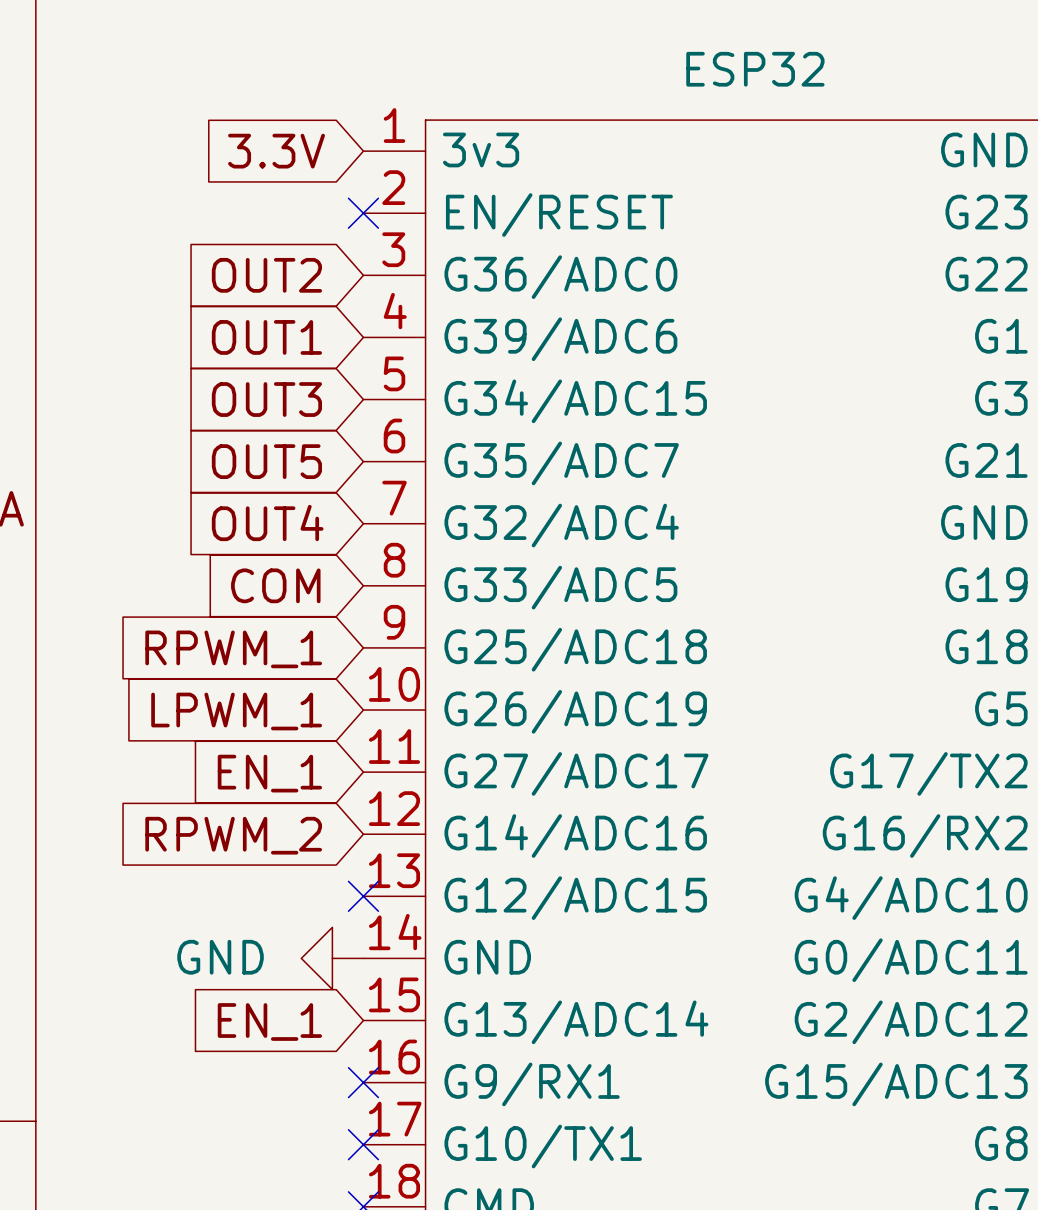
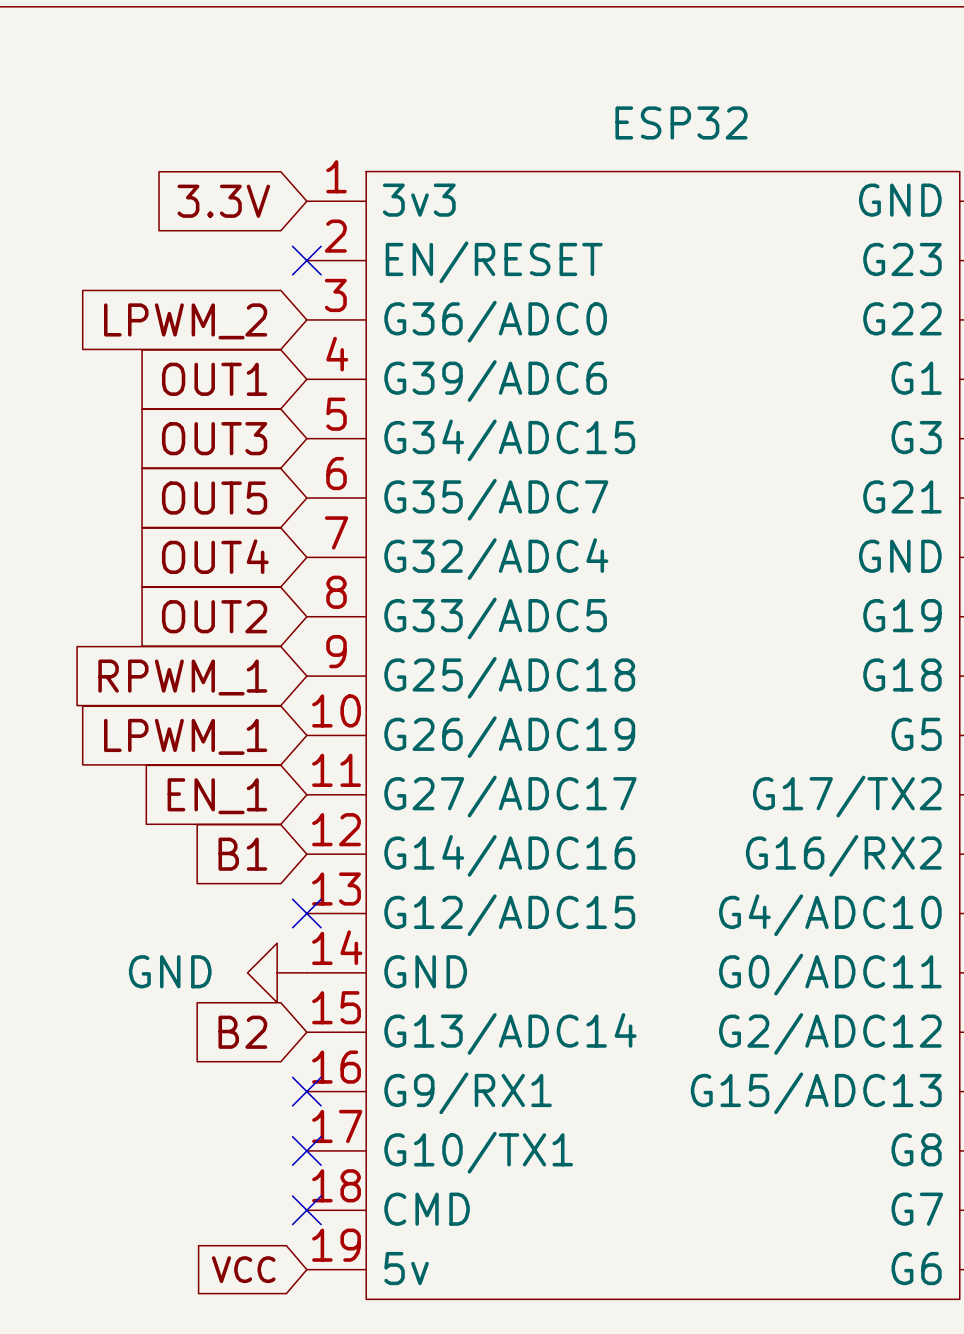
global label: OUT2 (266, 275) -> LPWM_2 (185, 321)
global label: COM (275, 585) -> OUT2 (214, 616)
global label: RPWM_2 (233, 835) -> B1 (242, 854)
global label: EN_1 (269, 1021) -> B2 (242, 1032)

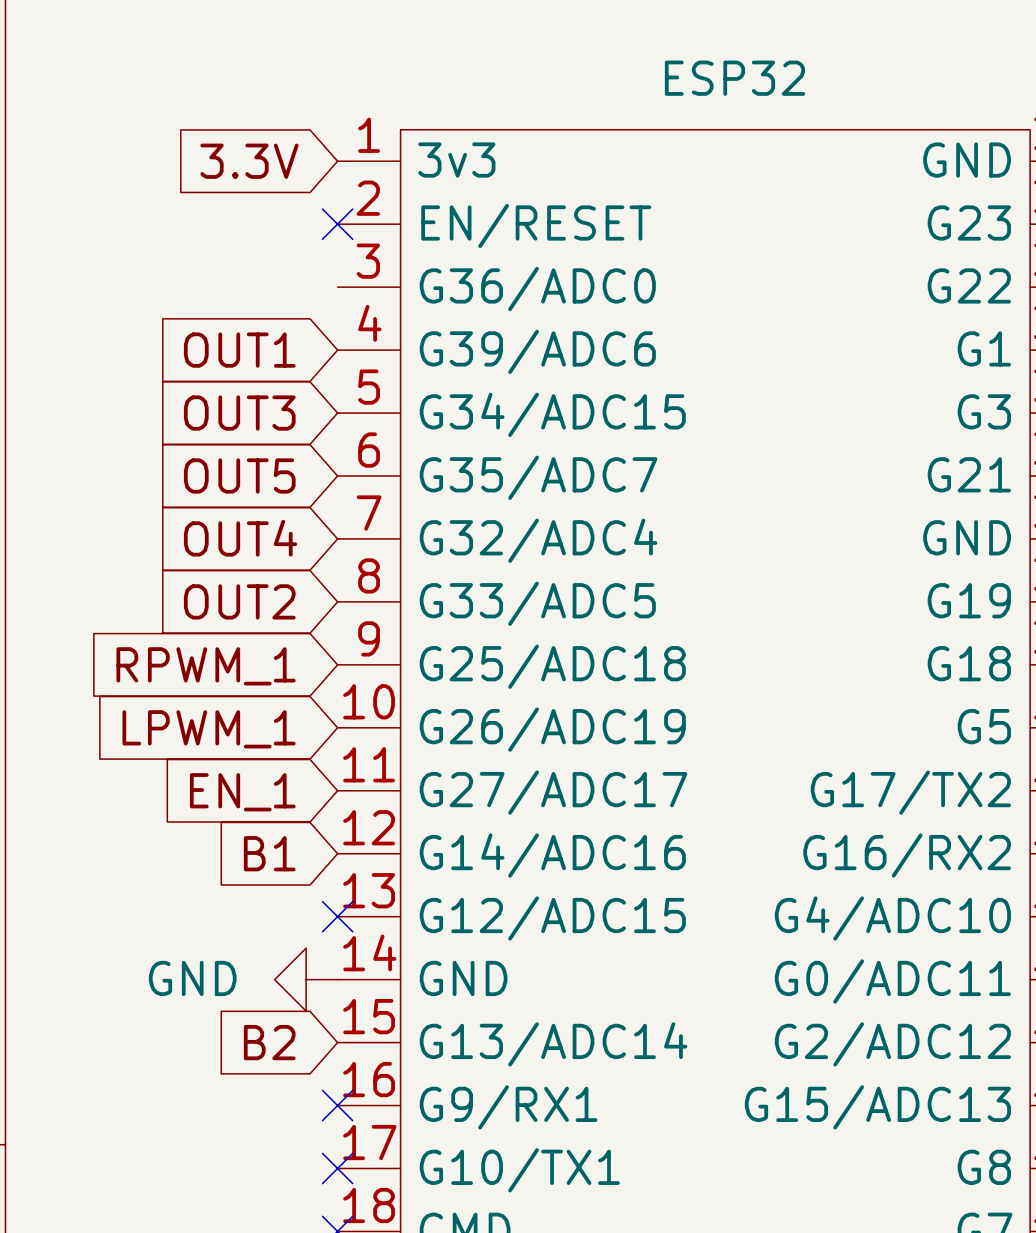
global label: LPWM_2 (185, 321) -> none

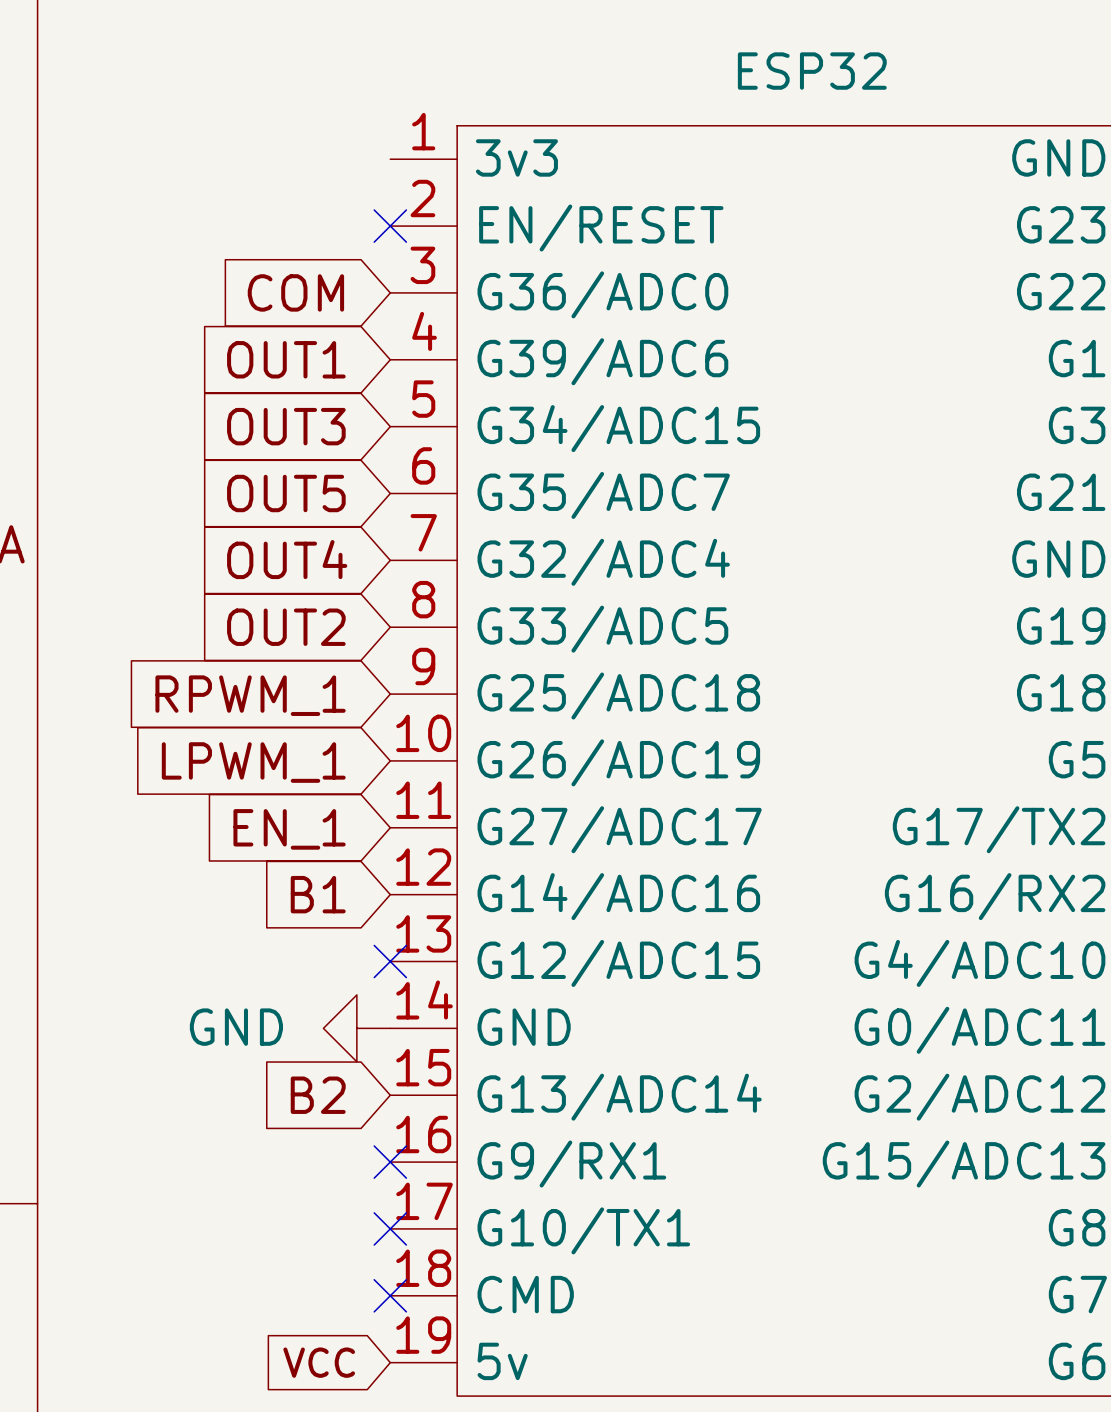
global label: 3.3V (249, 161) -> none
global label: none -> COM (295, 292)

